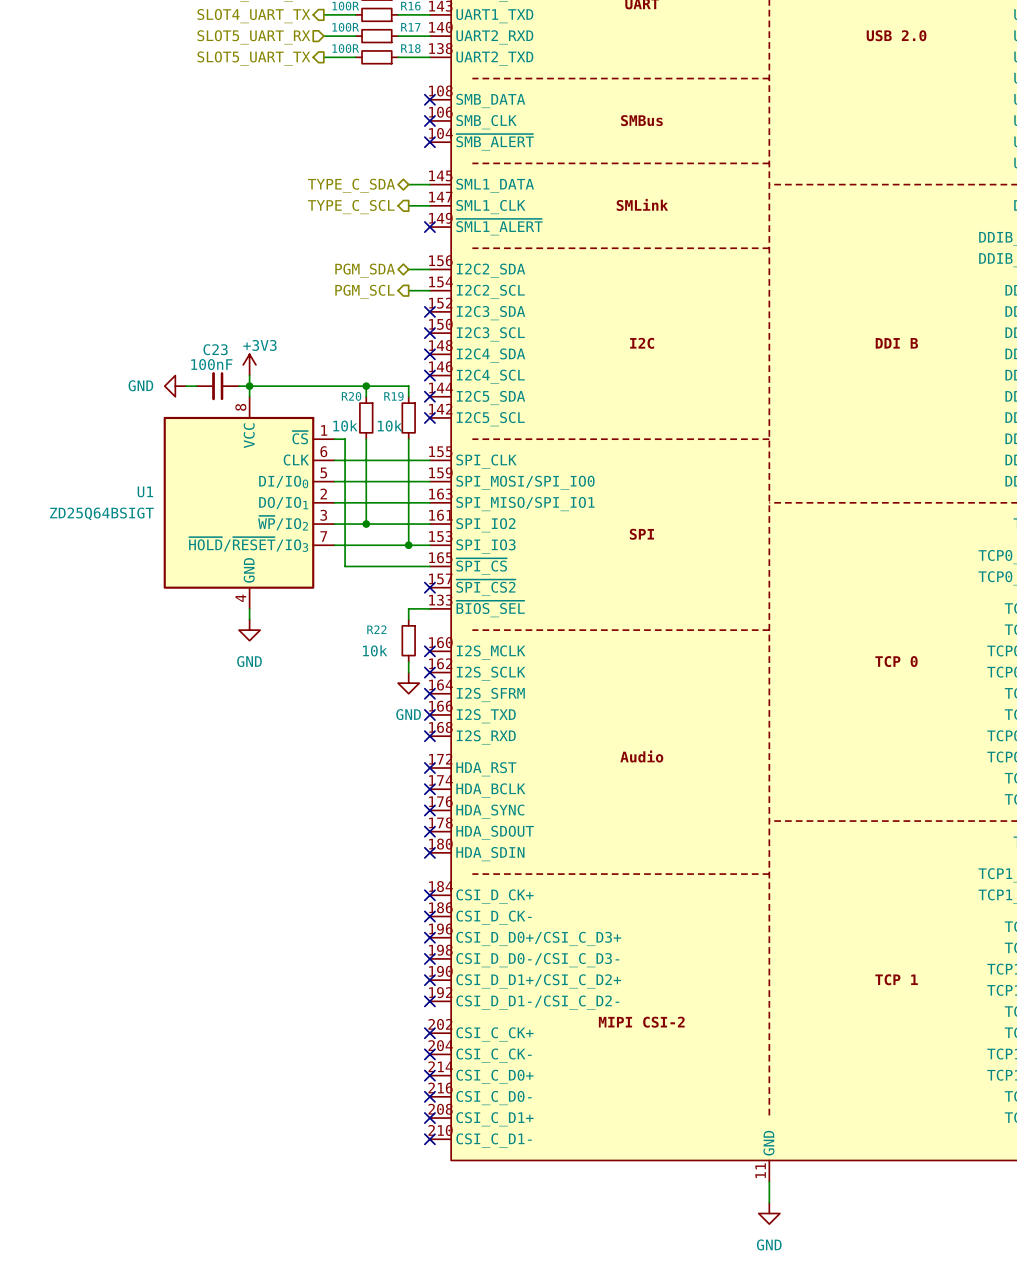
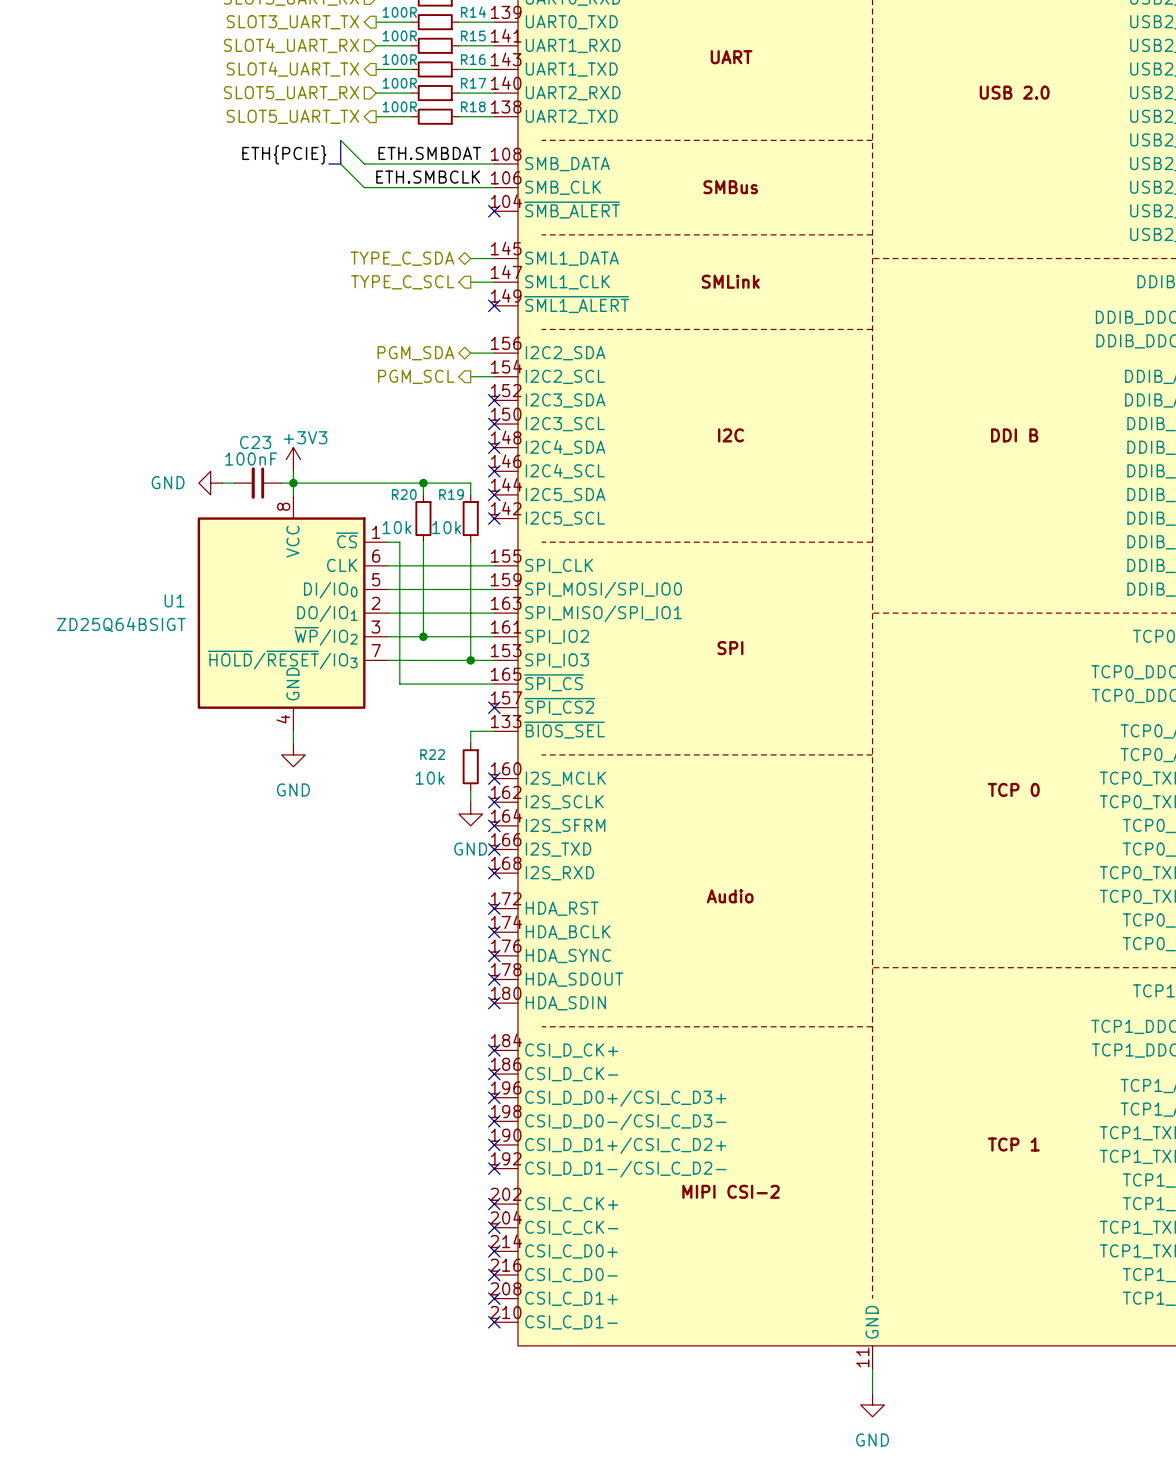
wire: none -> (340, 140) (364, 163) (494, 163)
bus: none -> (340, 140) (340, 163) (328, 163)
label: none -> ETH.SMBDAT (429, 153)
label: none -> ETH{PCIE} (284, 154)
wire: none -> (340, 163) (364, 187) (494, 187)
no-connect mark: (429, 99) -> none
label: none -> ETH.SMBCLK (428, 177)
no-connect mark: (429, 120) -> none

